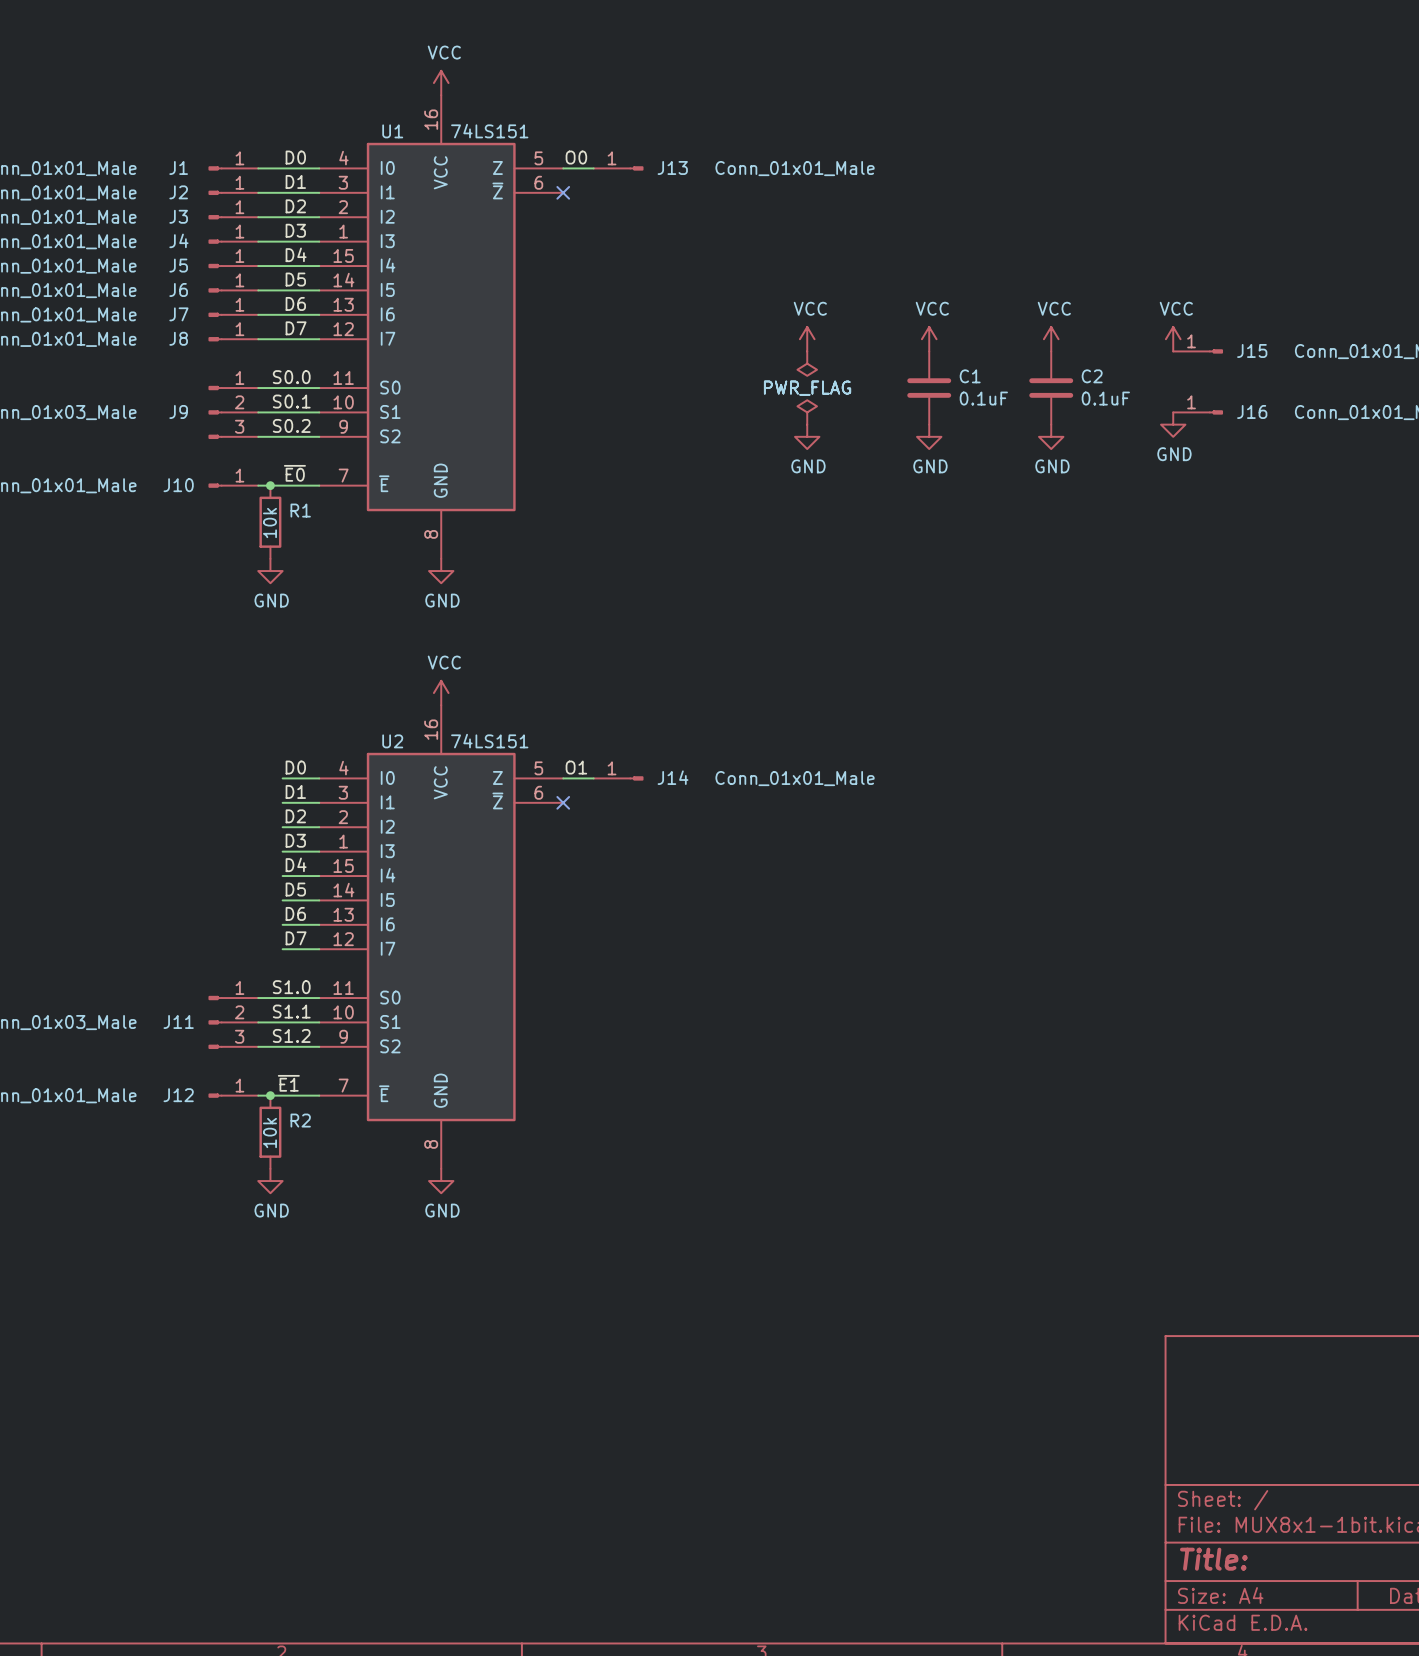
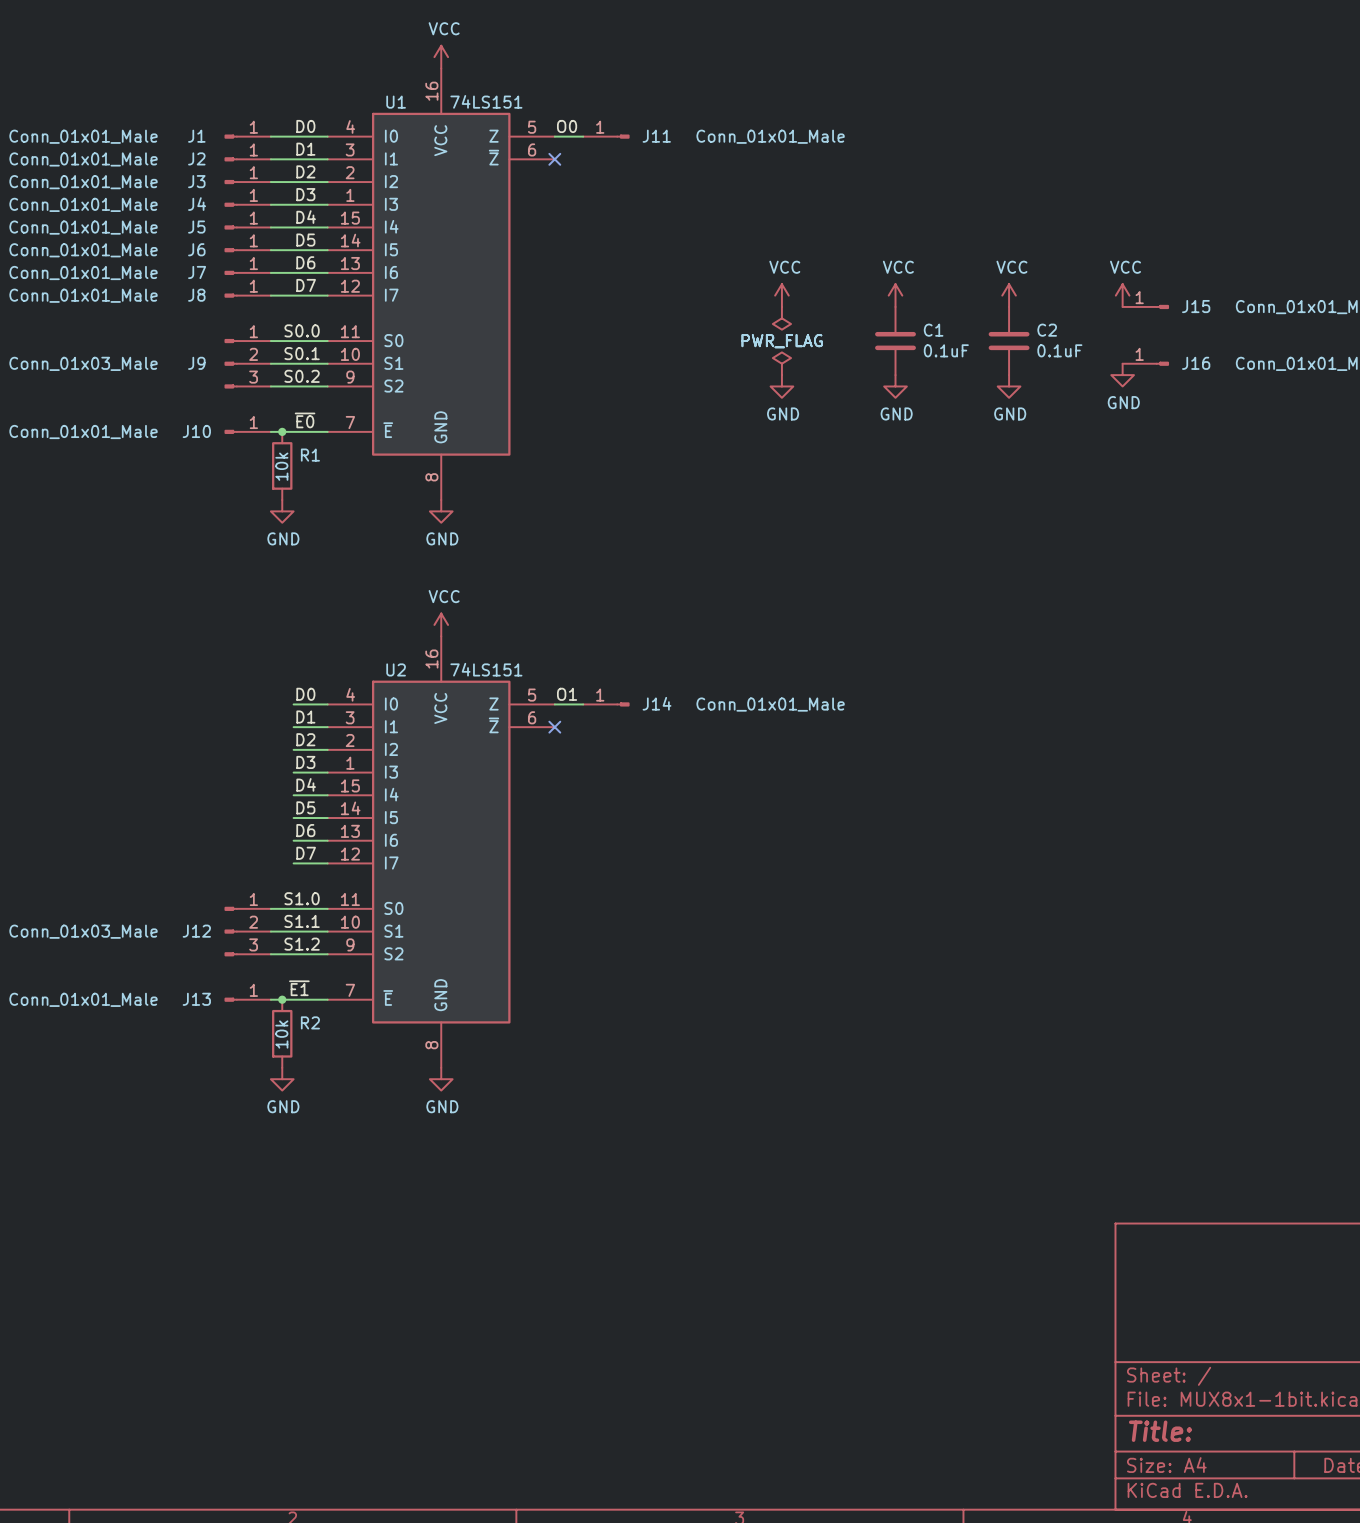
J13 name: J13 (672, 167) -> J11 (656, 136)
J11 name: J11 (178, 1021) -> J12 (196, 931)
J12 name: J12 (178, 1095) -> J13 (196, 999)

